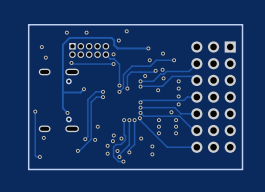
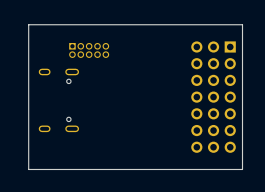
via: (126, 31) -> none
via: (66, 32) -> none
via: (86, 32) -> none
via: (118, 40) -> none
via: (41, 47) -> none
track: (148, 48) (117, 48) (111, 37) (69, 37) (62, 44) (62, 108) (67, 112) -> none
via: (148, 48) -> none
via: (163, 53) -> none
track: (105, 54) (119, 64) (119, 85) -> none
via: (113, 54) -> none
via: (45, 57) -> none
via: (149, 60) -> none
track: (174, 60) (156, 60) (150, 66) (131, 66) (123, 74) (123, 87) (119, 91) -> none
via: (174, 60) -> none
track: (71, 62) (113, 64) -> none
via: (71, 62) -> none
track: (196, 63) (189, 71) (166, 71) (153, 81) (140, 81) -> none
via: (113, 64) -> none
via: (162, 69) -> none
track: (155, 70) (131, 72) (127, 76) (127, 88) -> none
via: (155, 70) -> none
via: (145, 76) -> none
via: (163, 78) -> none
track: (196, 80) (192, 76) (172, 76) (162, 86) (140, 86) -> none
via: (140, 81) -> none
via: (178, 81) -> none
via: (119, 85) -> none
via: (140, 86) -> none
via: (127, 88) -> none
via: (178, 88) -> none
track: (83, 89) (80, 92) (62, 92) -> none
via: (83, 89) -> none
via: (158, 90) -> none
track: (103, 91) (95, 91) (87, 99) (87, 136) (85, 139) -> none
via: (103, 91) -> none
via: (119, 91) -> none
via: (178, 96) -> none
track: (103, 97) (96, 97) (91, 102) (91, 139) (77, 150) -> none
via: (103, 97) -> none
track: (196, 97) (187, 97) (183, 100) (142, 100) (140, 102) -> none
via: (140, 102) -> none
via: (178, 104) -> none
track: (140, 107) (174, 107) (180, 113) (196, 113) -> none
via: (140, 107) -> none
track: (35, 111) (35, 155) (39, 156) -> none
via: (35, 111) -> none
via: (67, 112) -> none
track: (140, 112) (143, 116) (179, 116) (193, 130) (196, 130) -> none
via: (140, 112) -> none
via: (171, 112) -> none
track: (139, 118) (167, 147) (196, 147) -> none
via: (139, 118) -> none
track: (124, 120) (125, 140) (121, 144) (116, 144) (113, 147) (113, 156) (118, 161) (123, 161) -> none
via: (124, 120) -> none
track: (129, 120) (129, 144) (119, 156) -> none
via: (129, 120) -> none
track: (134, 120) (134, 144) (129, 152) -> none
via: (134, 120) -> none
via: (158, 120) -> none
via: (176, 120) -> none
via: (97, 126) -> none
via: (158, 126) -> none
via: (176, 126) -> none
via: (158, 133) -> none
via: (176, 133) -> none
via: (113, 135) -> none
via: (43, 137) -> none
via: (121, 138) -> none
via: (141, 138) -> none
via: (85, 139) -> none
via: (95, 139) -> none
via: (112, 141) -> none
via: (107, 145) -> none
via: (152, 146) -> none
via: (77, 150) -> none
via: (117, 151) -> none
via: (129, 152) -> none
via: (107, 153) -> none
via: (152, 154) -> none
via: (39, 156) -> none
via: (119, 156) -> none
via: (123, 161) -> none

